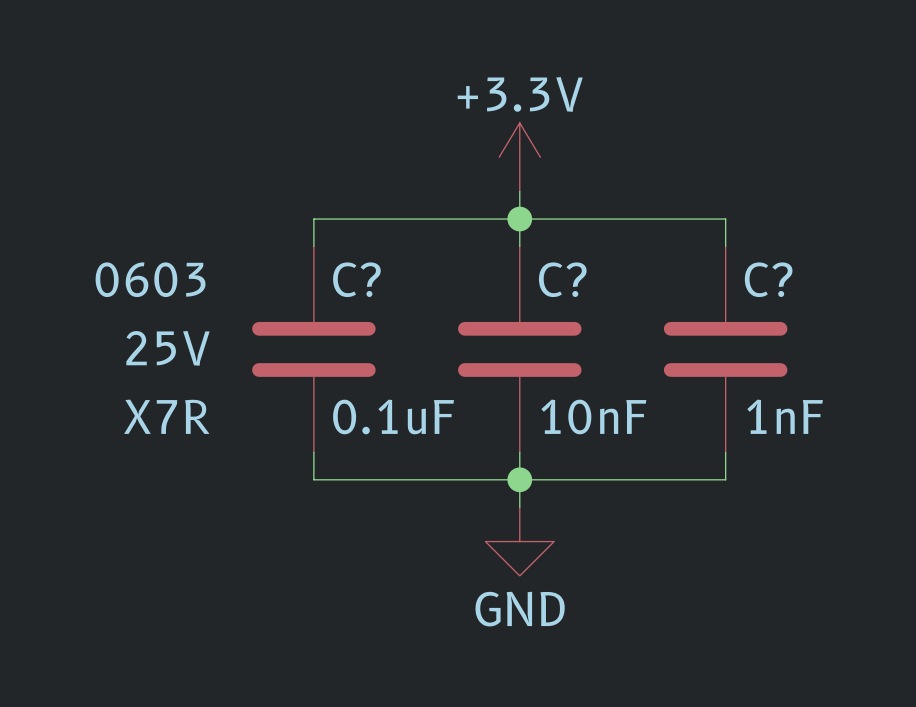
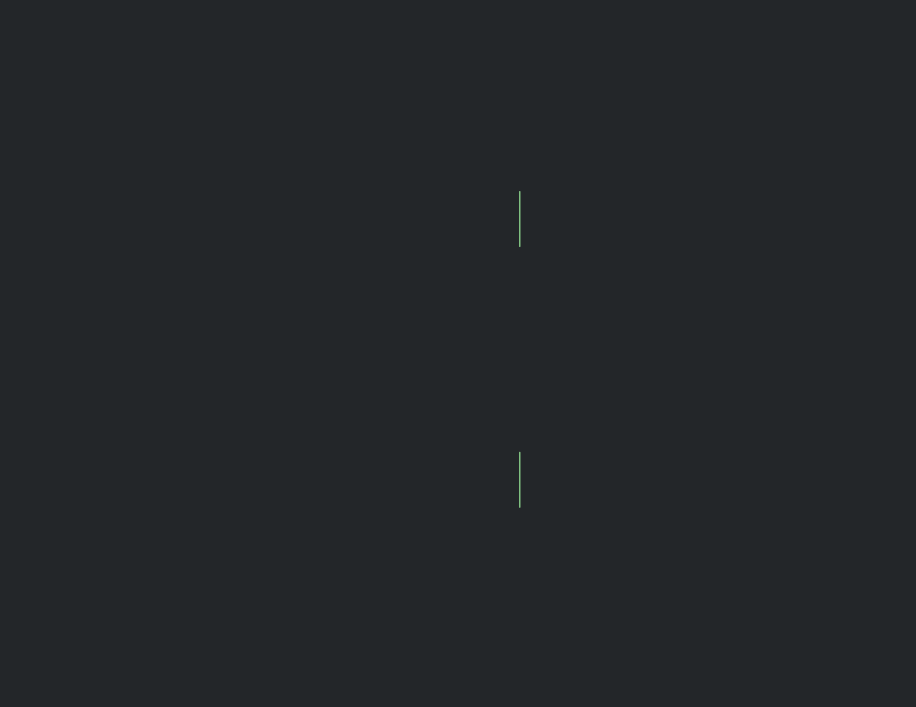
power symbol: +3.3V (519, 157) -> none
junction: (519, 219) -> none
wire: (313, 246) (313, 219) (725, 219) (725, 246) -> none
C?: 0.1uF (313, 349) -> none
C?: 10nF (519, 349) -> none
C?: 1nF (725, 349) -> none
wire: (313, 452) (313, 479) (725, 479) (725, 452) -> none
junction: (519, 479) -> none
power symbol: GND (519, 541) -> none

